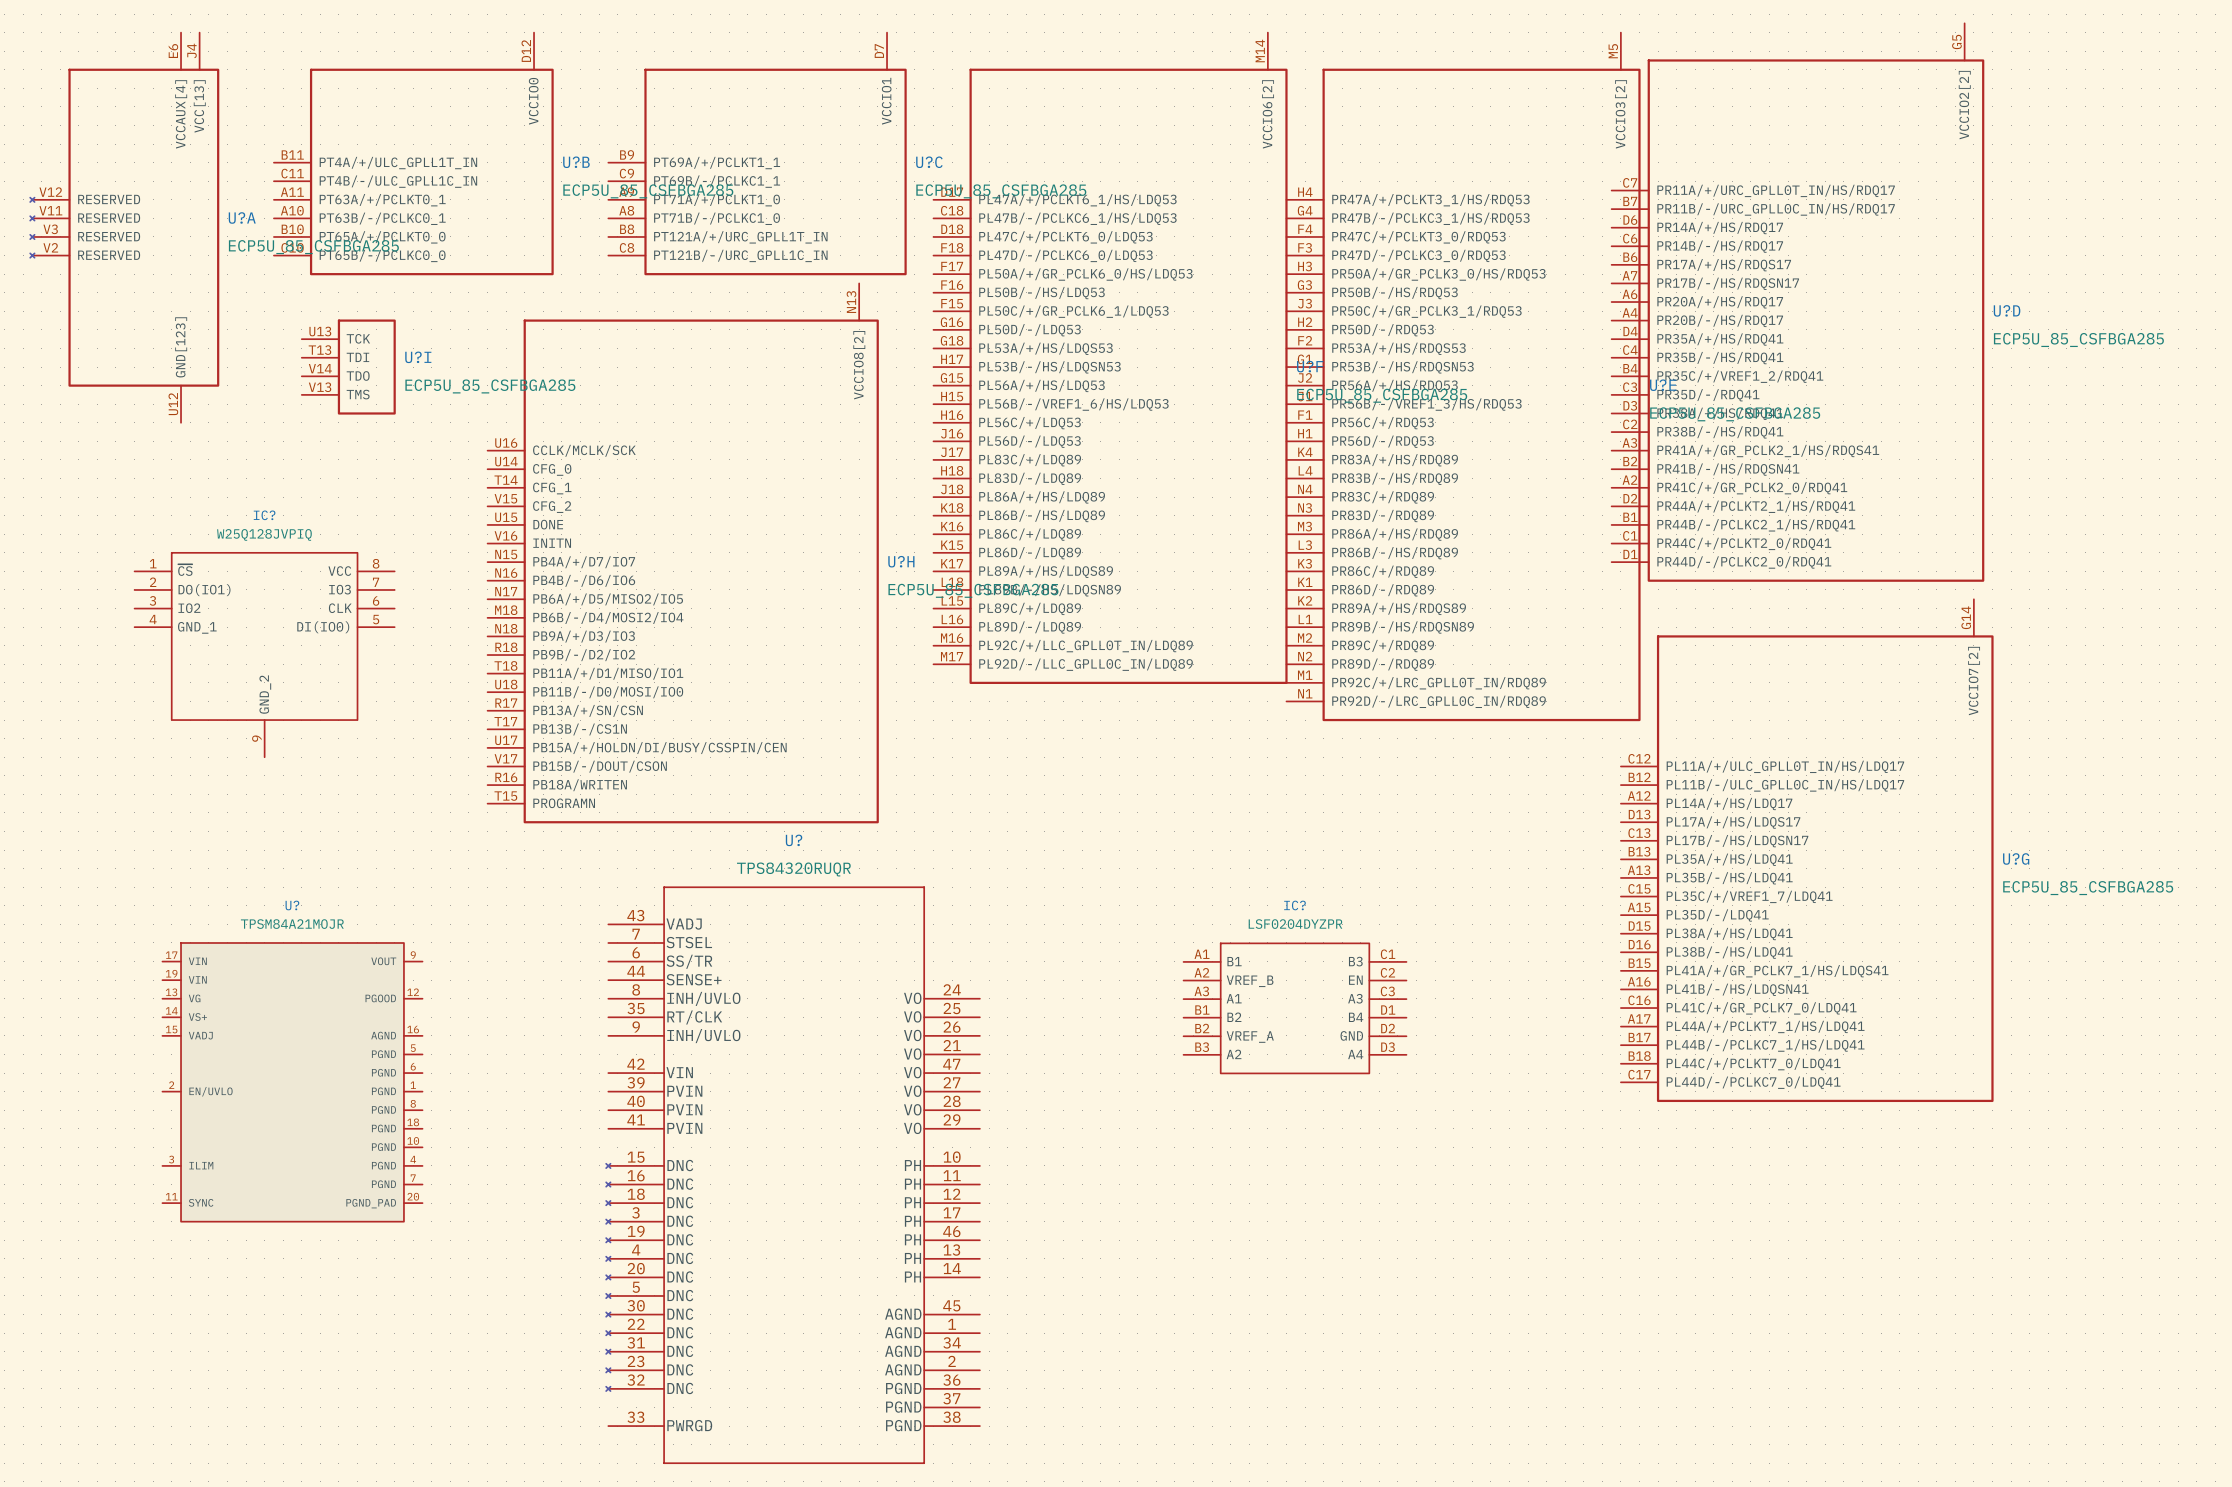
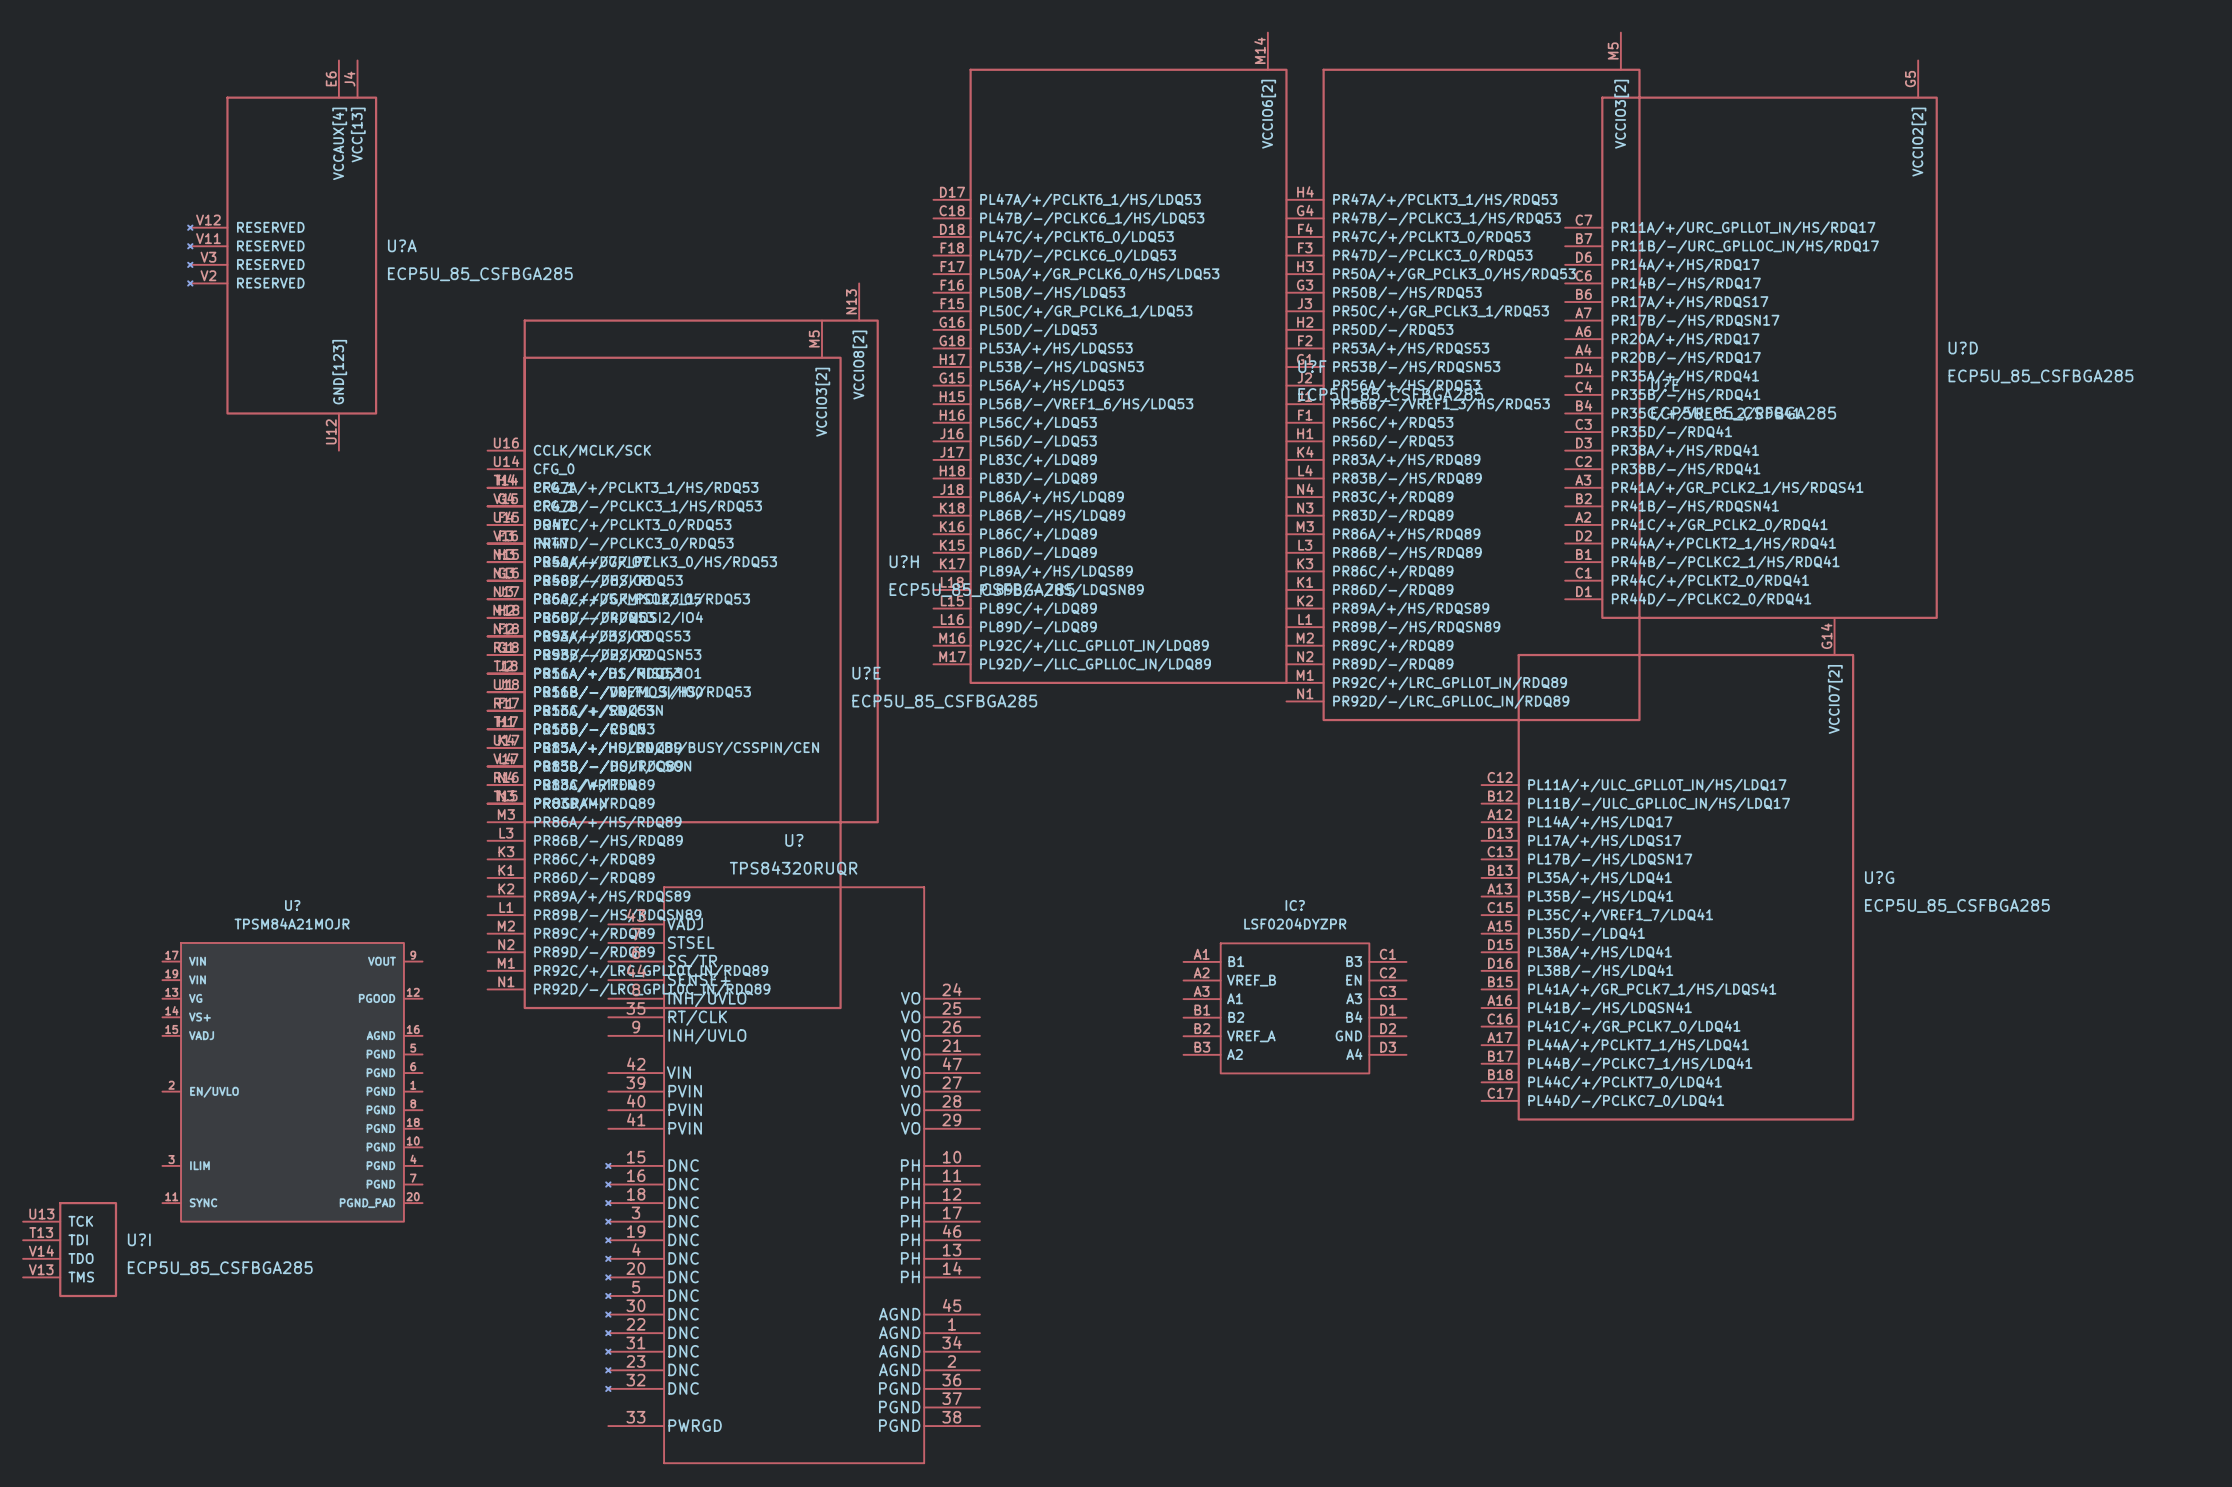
U?B: ECP5U_85_CSFBGA285 (413, 153) -> none
U?C: ECP5U_85_CSFBGA285 (757, 153) -> none
U?A position: (124, 227) -> (282, 255)
U?D position: (1797, 302) -> (1751, 339)
U?I: ECP5U_85_CSFBGA285 (348, 367) -> none
IC?: W25Q128JVPIQ (264, 654) -> none
U?E: none -> ECP5U_85_CSFBGA285 (664, 664)
U?G position: (1807, 850) -> (1667, 869)
U?I: none -> ECP5U_85_CSFBGA285 (70, 1249)

